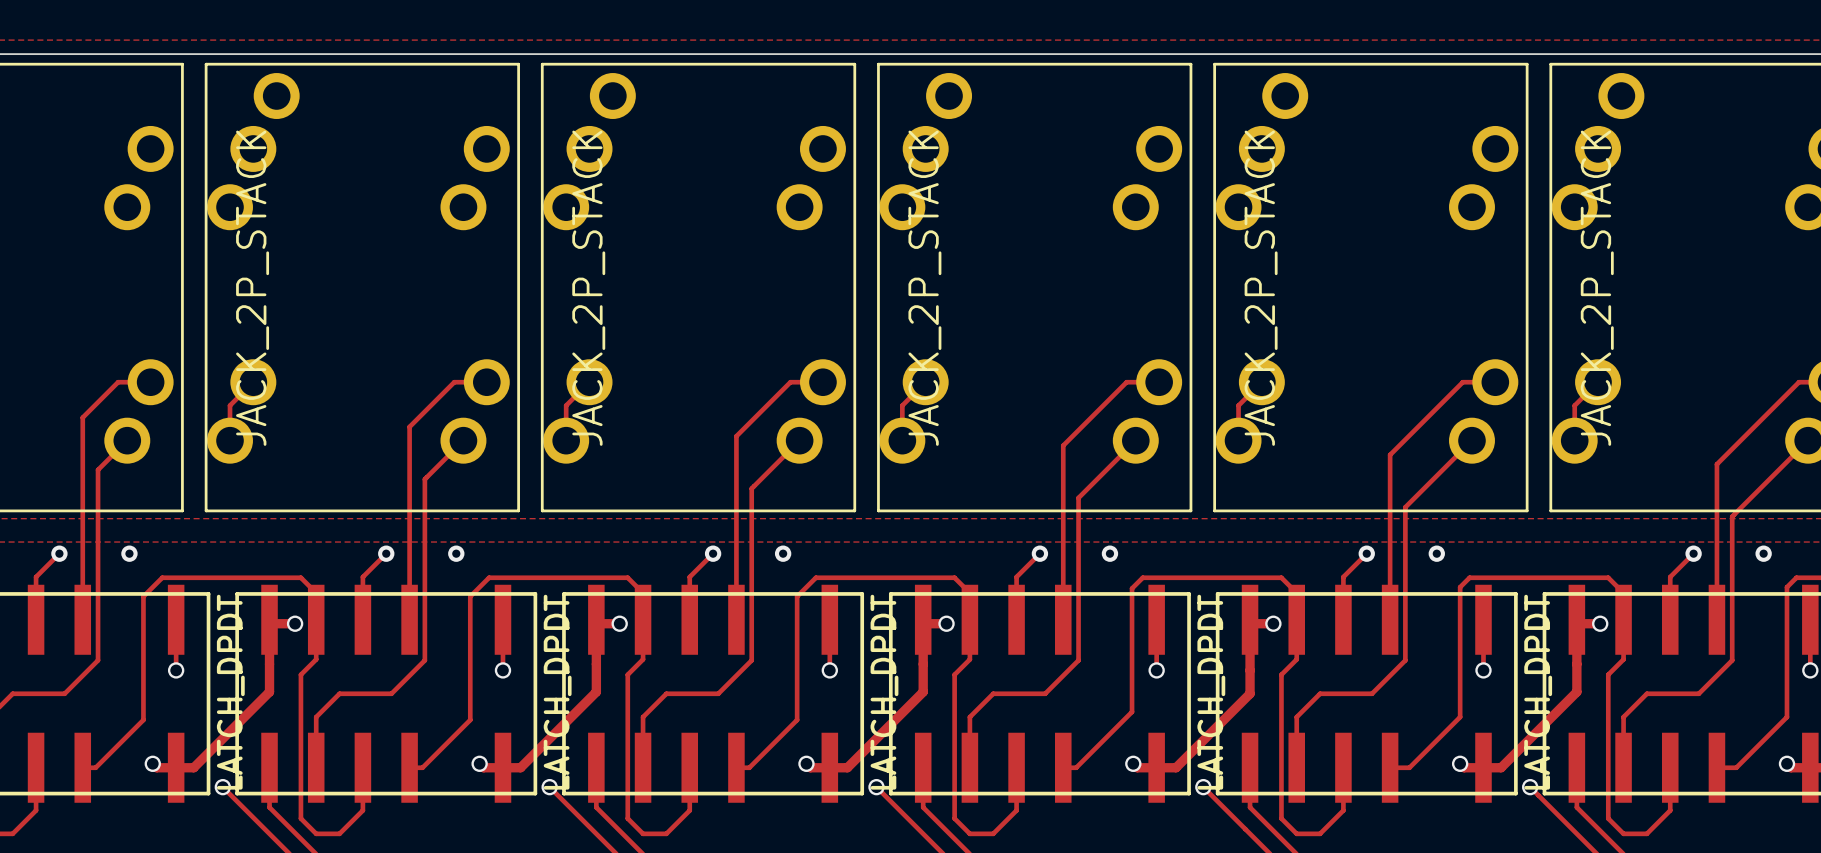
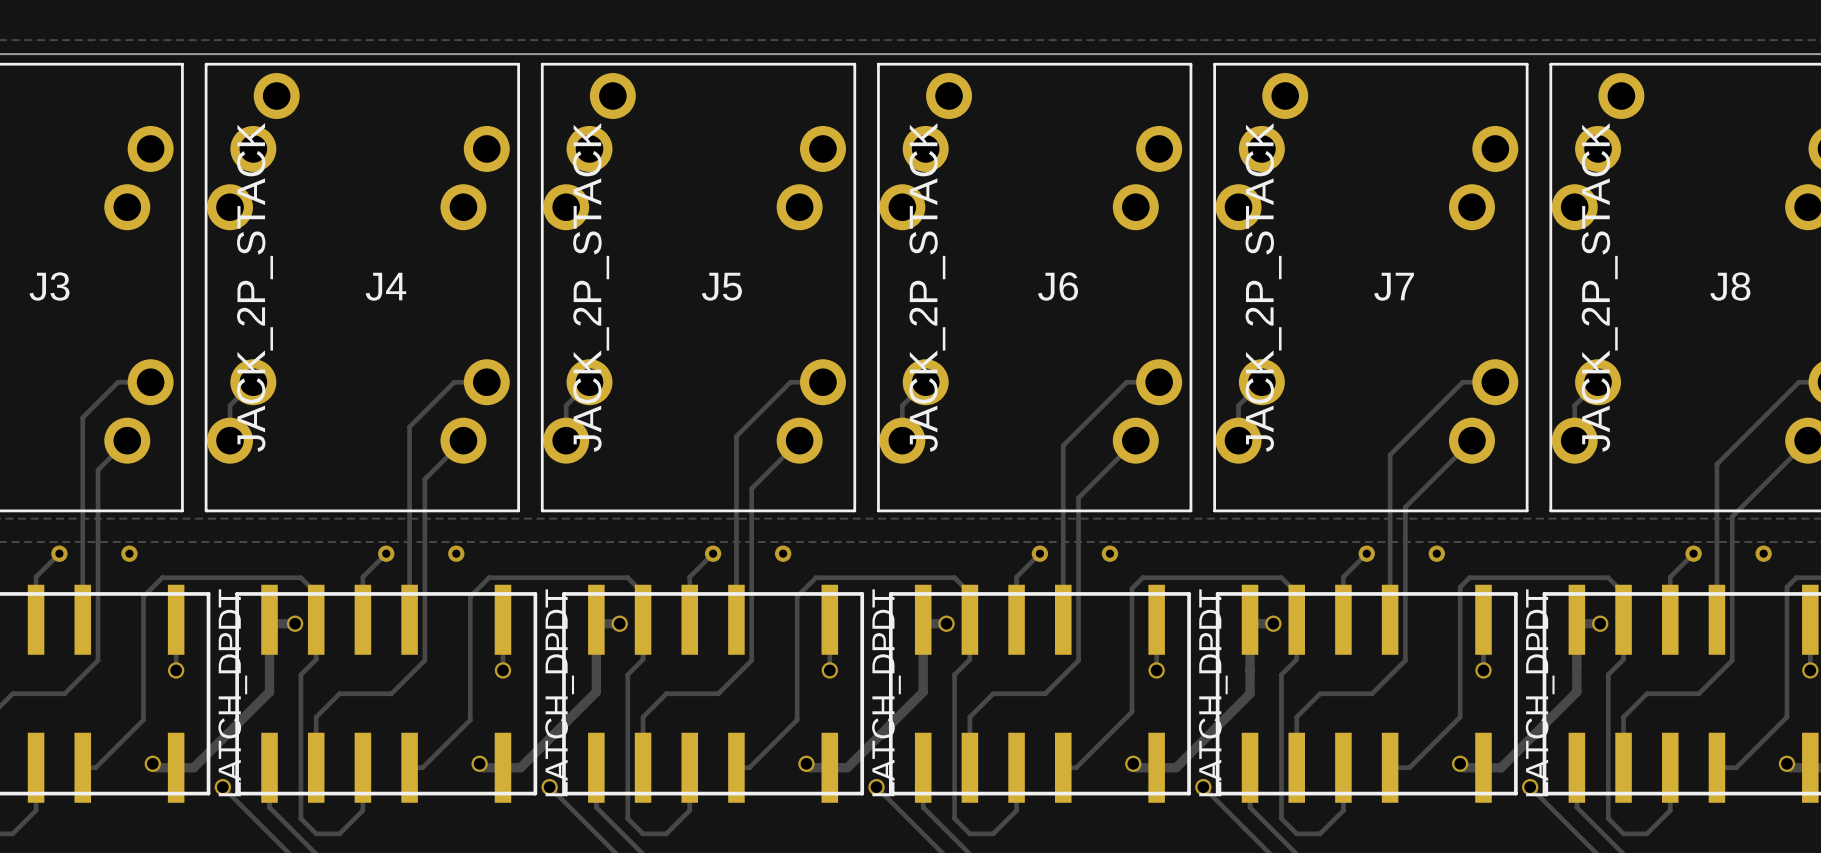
J4 name: none -> J4 (385, 286)
J3 name: none -> J3 (49, 286)
J5 name: none -> J5 (721, 286)
J6 name: none -> J6 (1058, 286)
J7 name: none -> J7 (1394, 286)
J8 name: none -> J8 (1730, 286)

